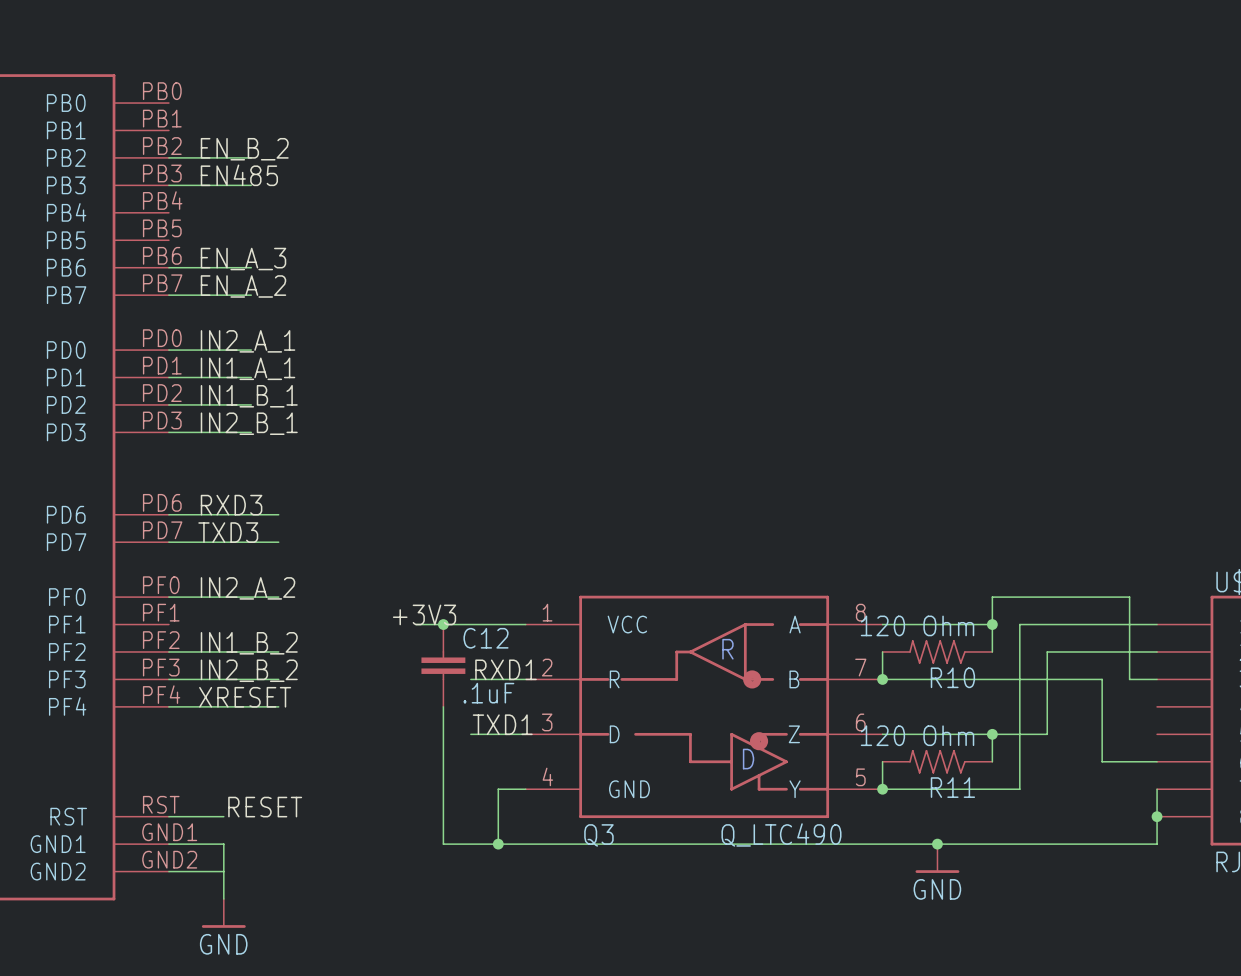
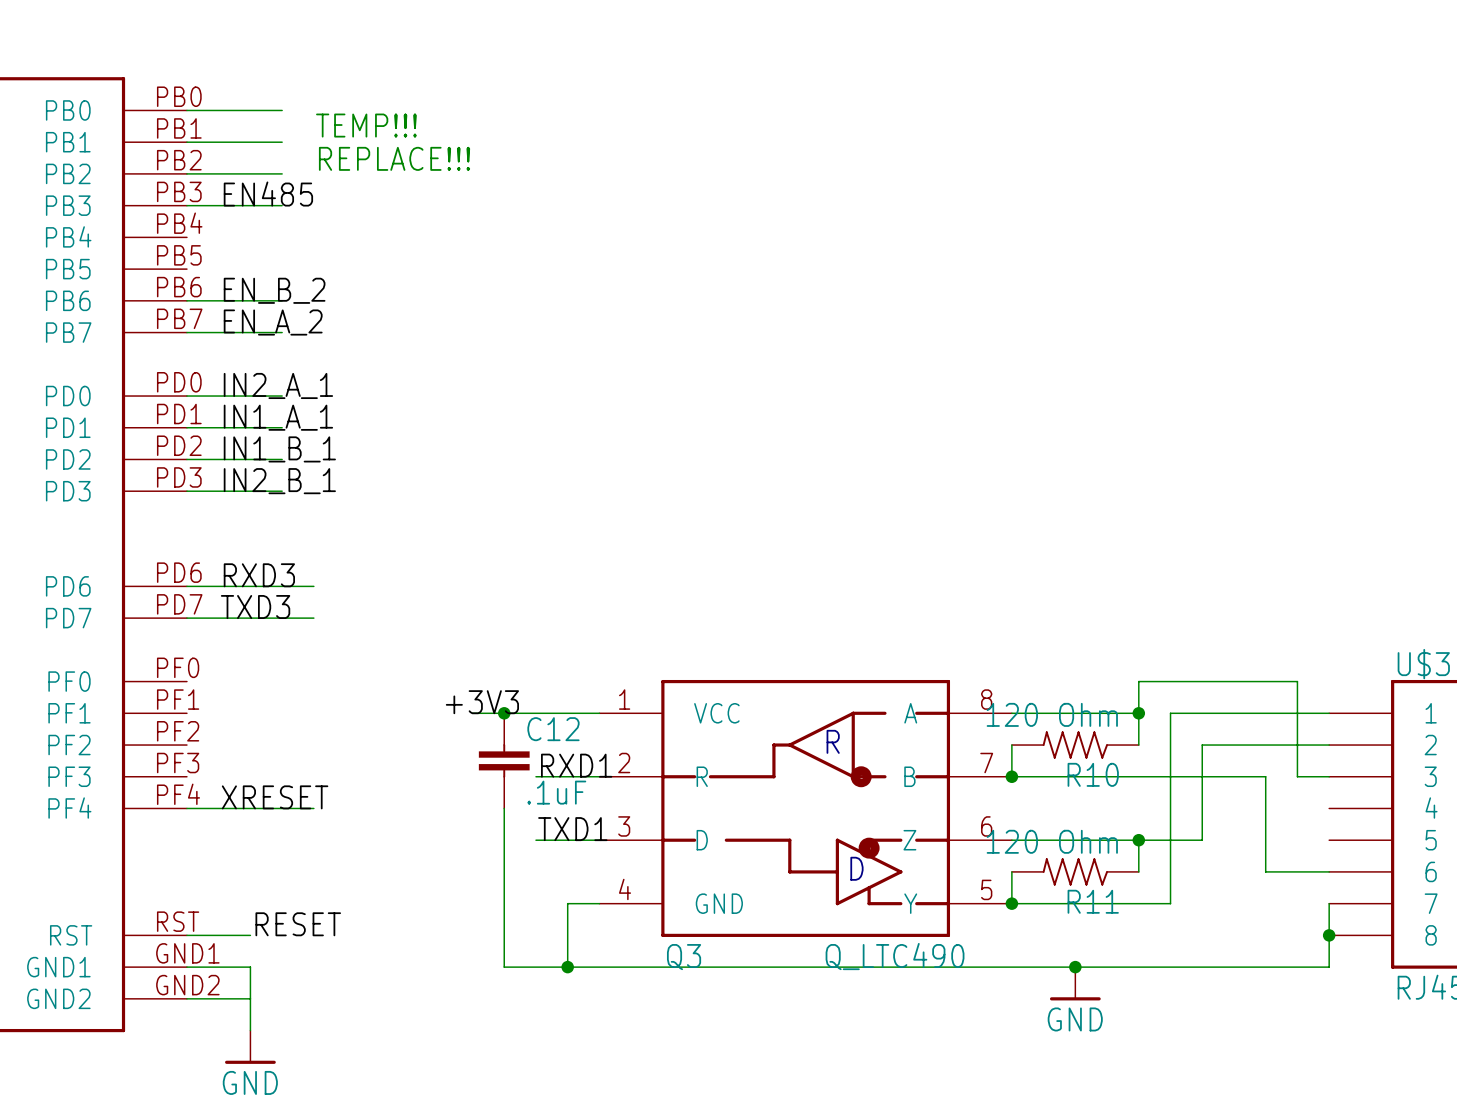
wire: none -> (186, 110) (282, 110)
text: none -> TEMP!!! (366, 125)
wire: none -> (186, 142) (282, 142)
text: none -> REPLACE!!! (394, 158)
label: EN_B_2 (244, 149) -> none
label: EN_A_3 (243, 259) -> EN_B_2 (274, 290)
label: IN2_A_2 (248, 588) -> none
wire: (168, 597) (278, 597) -> none
label: IN1_B_2 (249, 643) -> none
wire: (168, 651) (278, 651) -> none
label: IN2_B_2 (249, 670) -> none
wire: (168, 679) (278, 679) -> none

